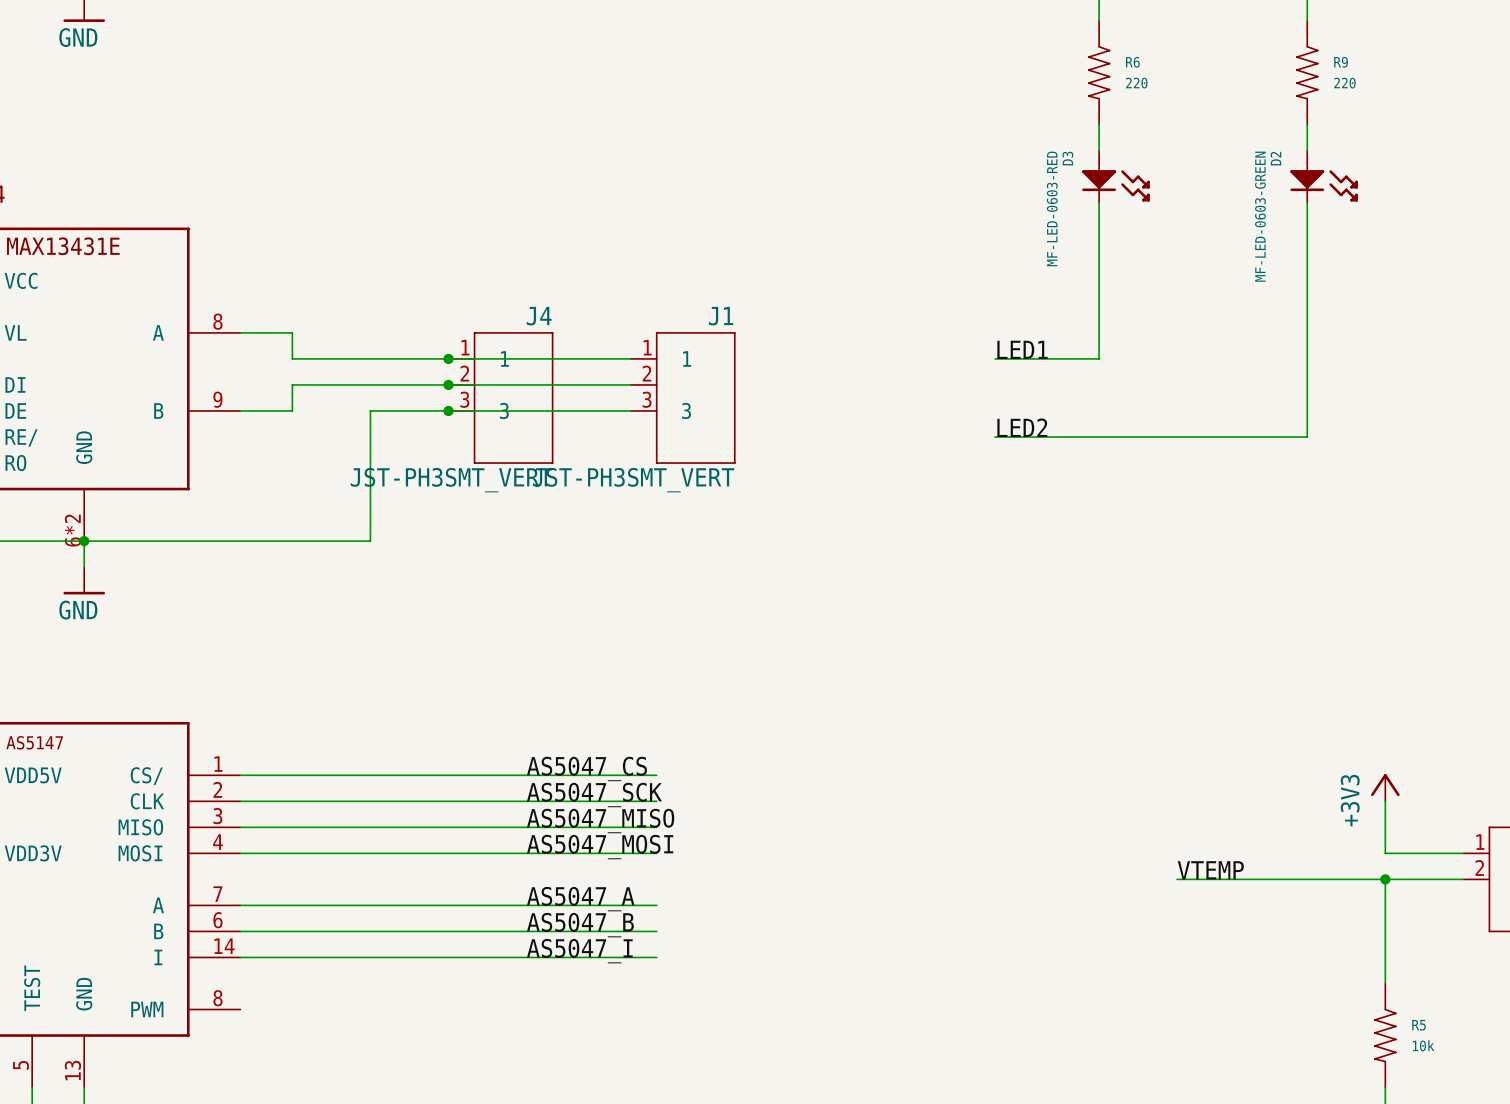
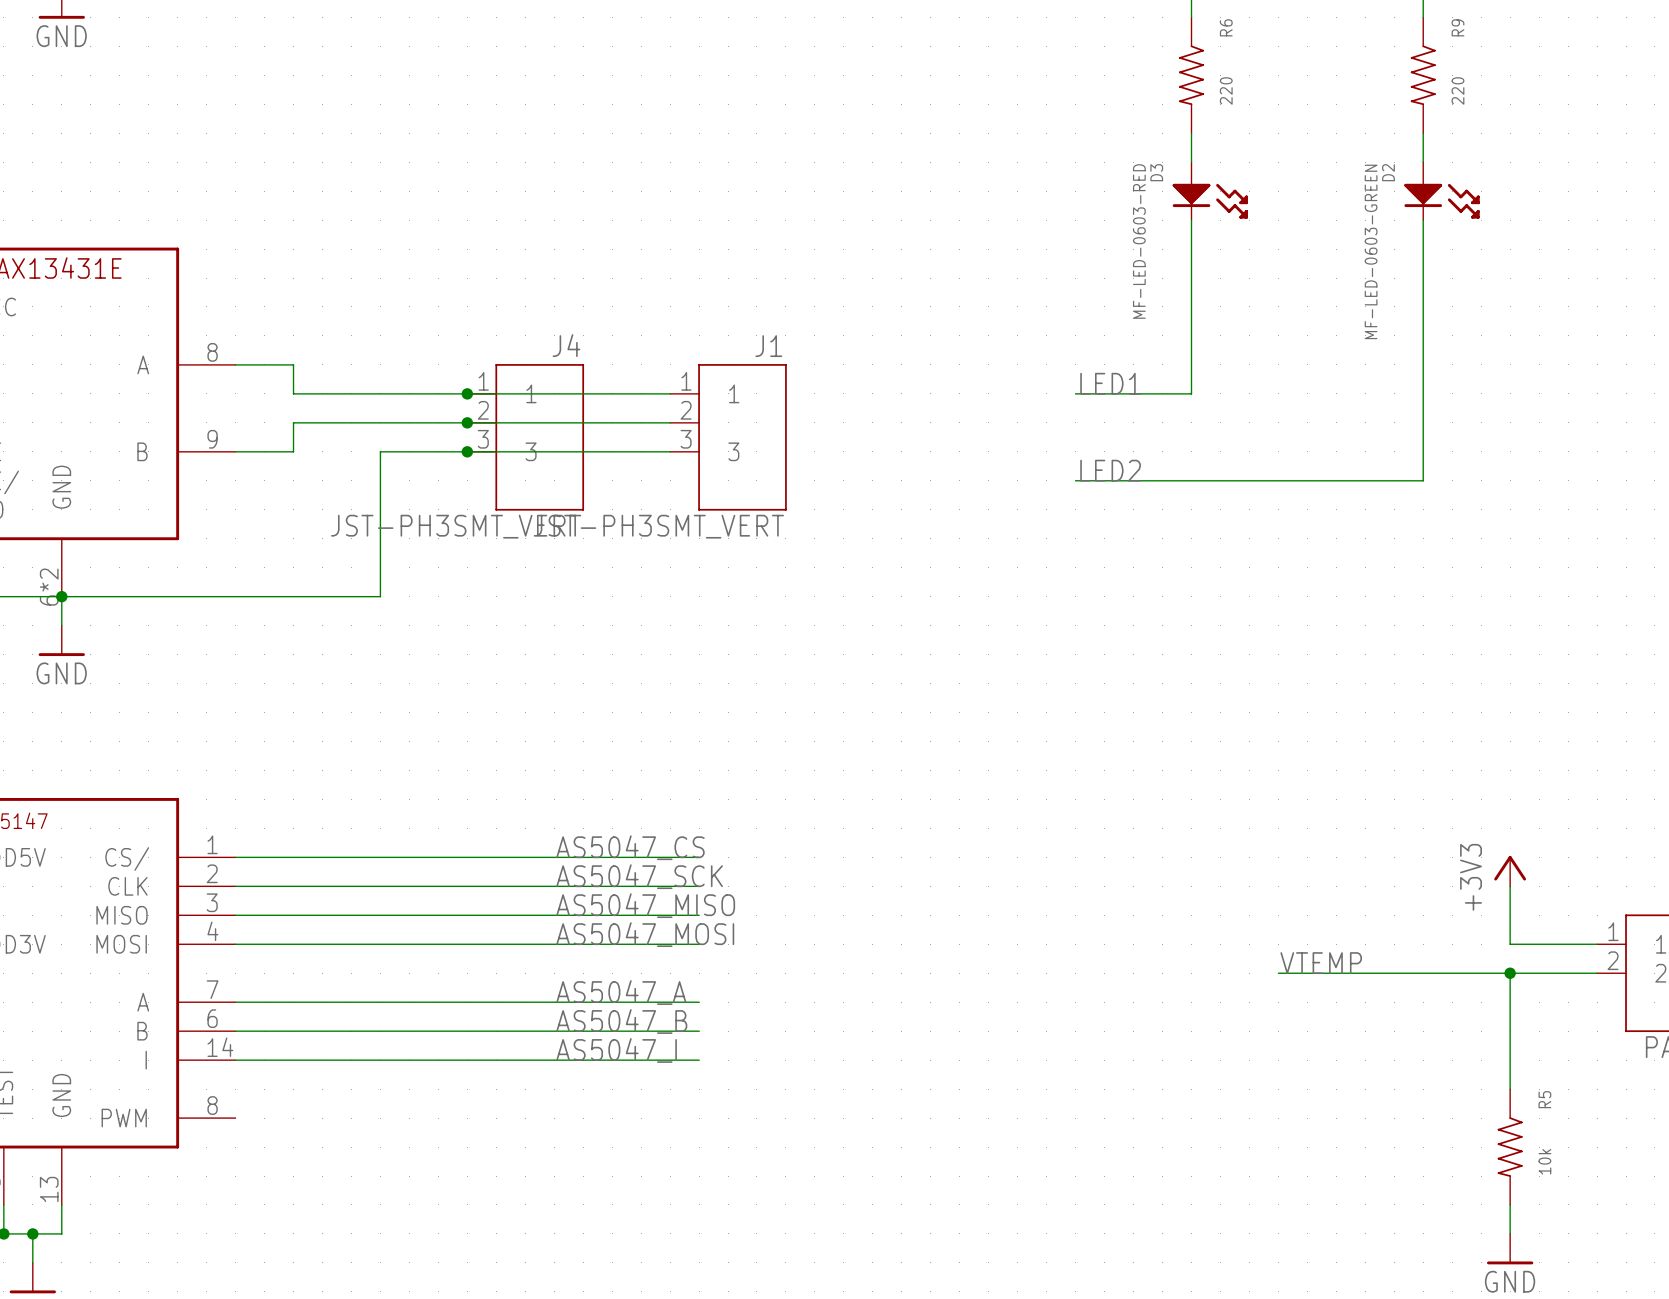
R6 name rotation: 0° (1132, 62) -> 90° counterclockwise (1226, 27)
R6 name position: R6 (1132, 62) -> R6 (1226, 27)
R9 name rotation: 0° (1341, 62) -> 90° counterclockwise (1458, 27)
R9 name position: R9 (1341, 62) -> R9 (1458, 27)
R6 value rotation: 0° (1136, 83) -> 90° counterclockwise (1226, 91)
R9 value rotation: 0° (1344, 83) -> 90° counterclockwise (1458, 91)
R5 name rotation: 0° (1419, 1025) -> 90° counterclockwise (1544, 1099)
R5 name position: R5 (1419, 1025) -> R5 (1544, 1099)
R5 value rotation: 0° (1423, 1045) -> 90° counterclockwise (1544, 1161)

